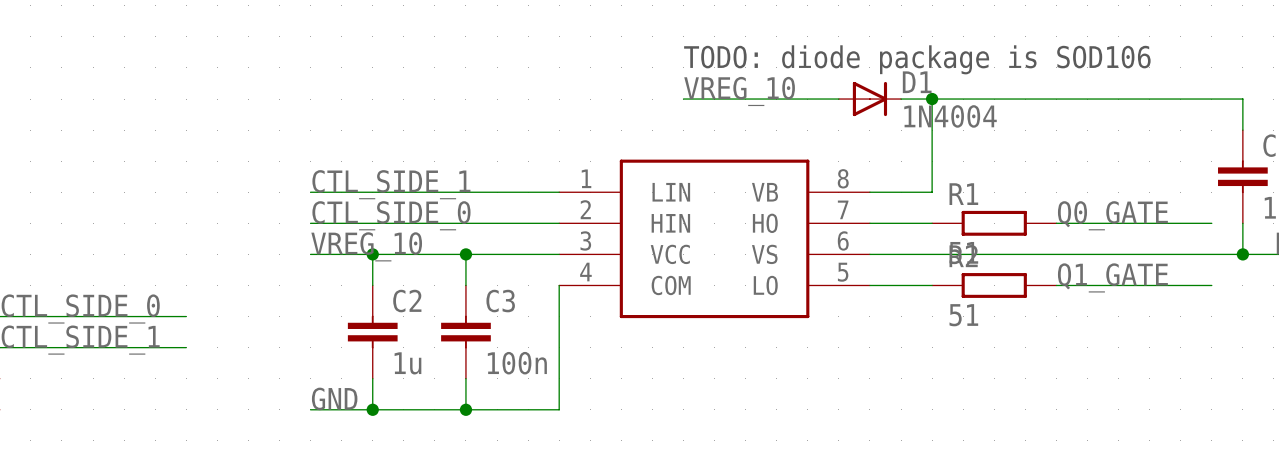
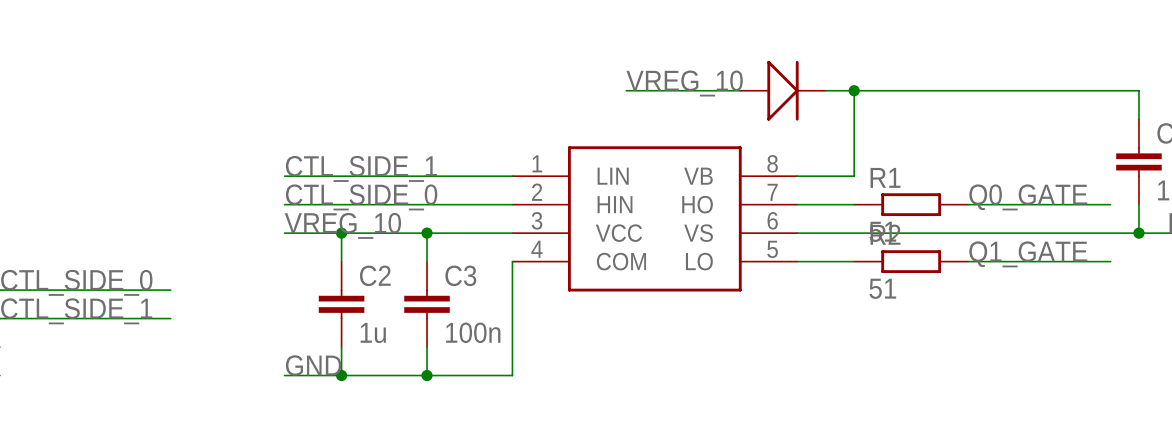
text: TODO: diode package is SOD106 (917, 59) -> none
part: none -> (782, 90)
D1: 1N4004 (869, 99) -> none

